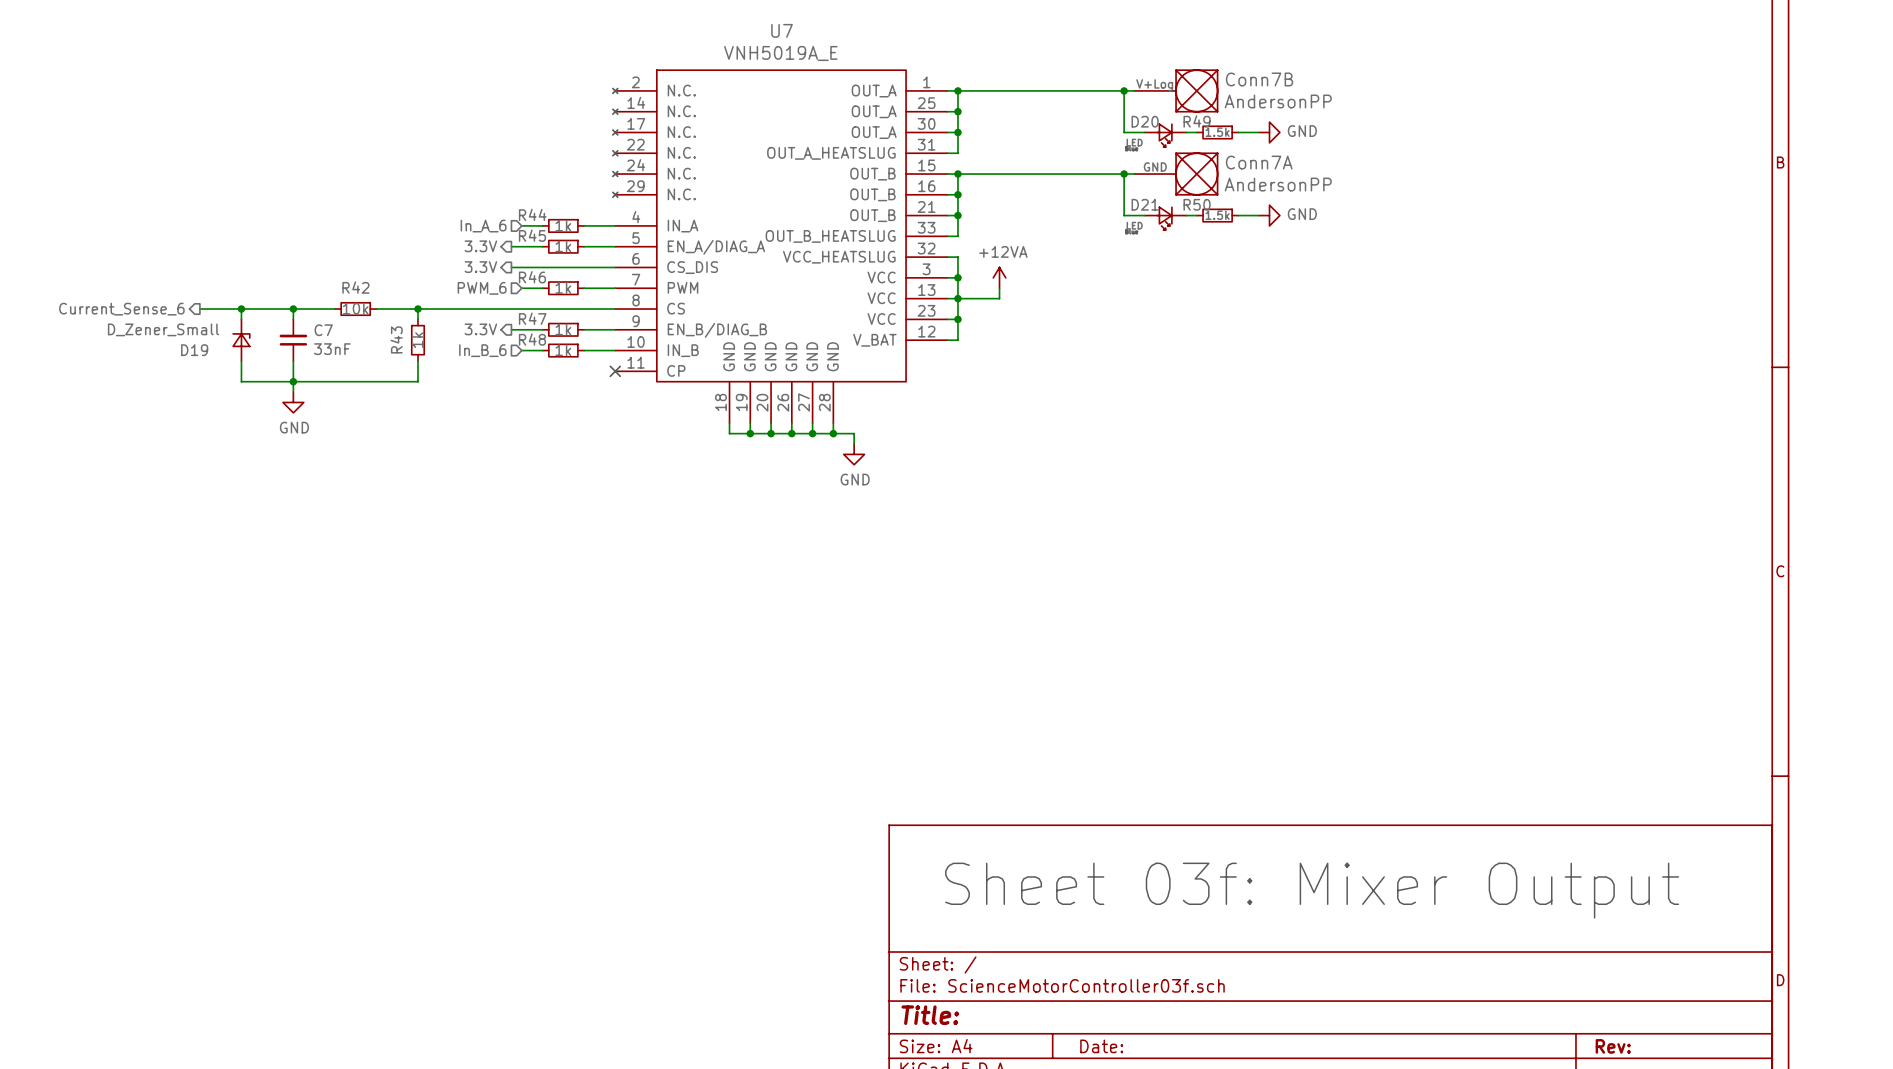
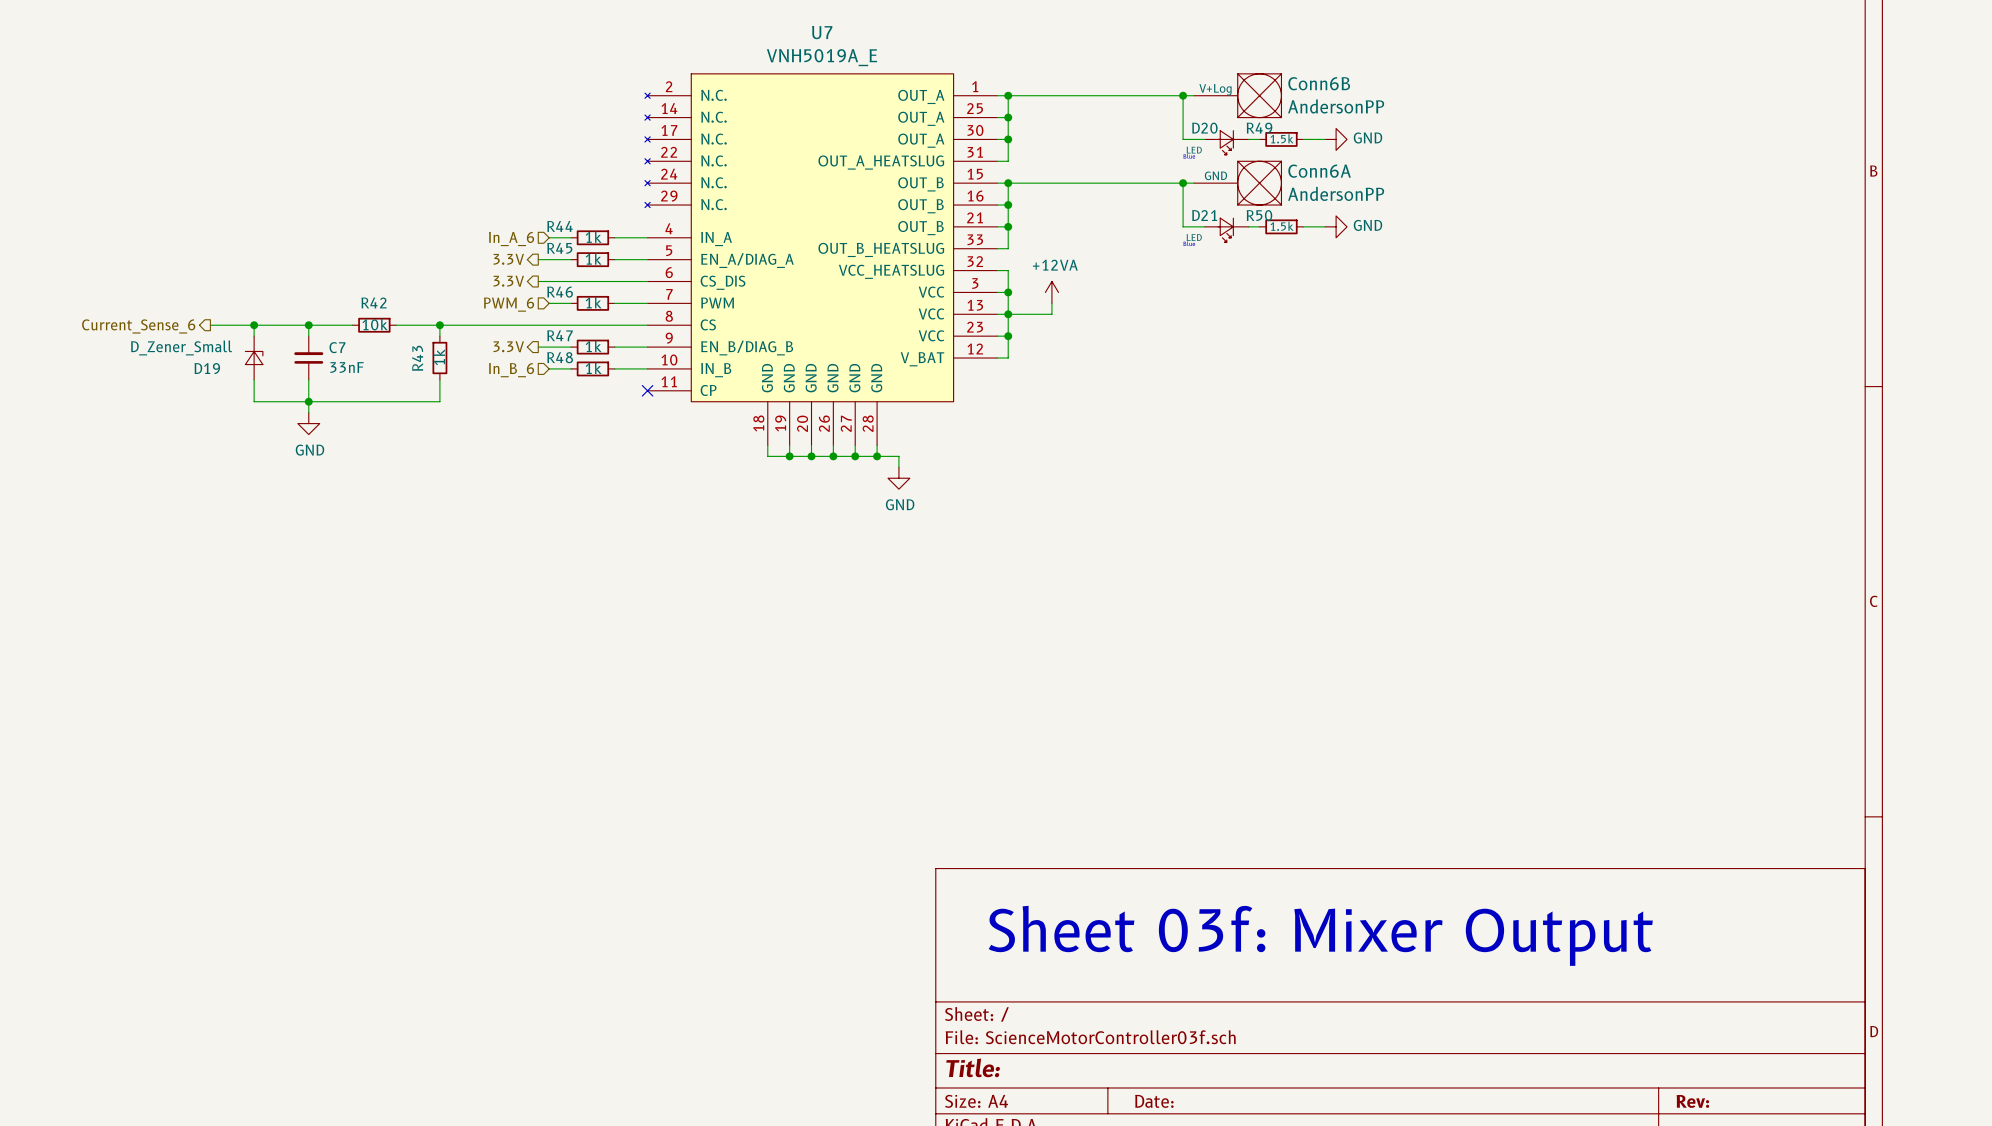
Conn7B name: Conn7B (1259, 79) -> Conn6B (1319, 83)
Conn7A name: Conn7A (1259, 162) -> Conn6A (1319, 171)

